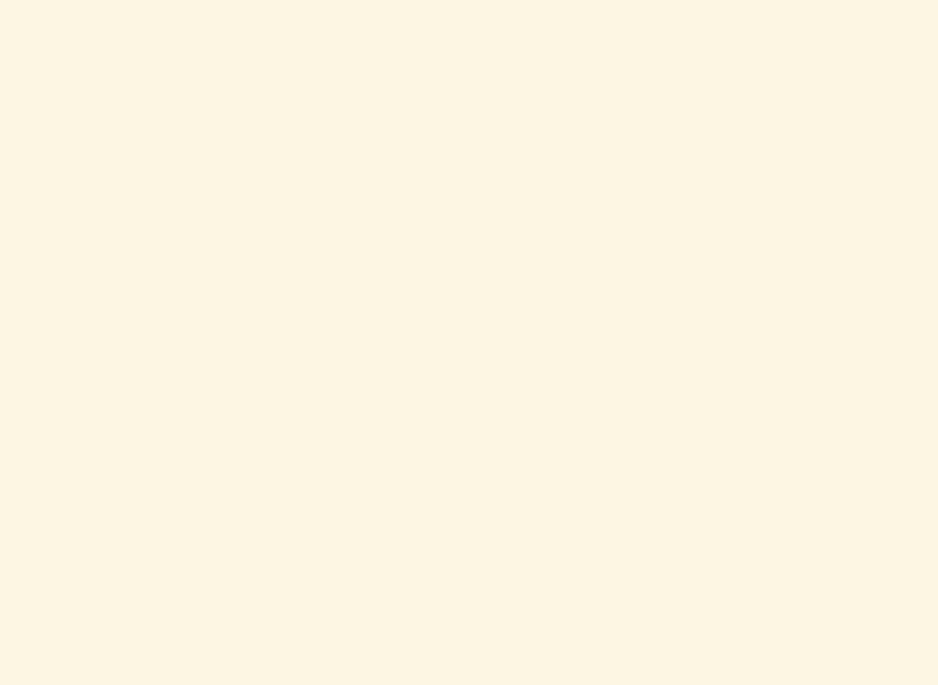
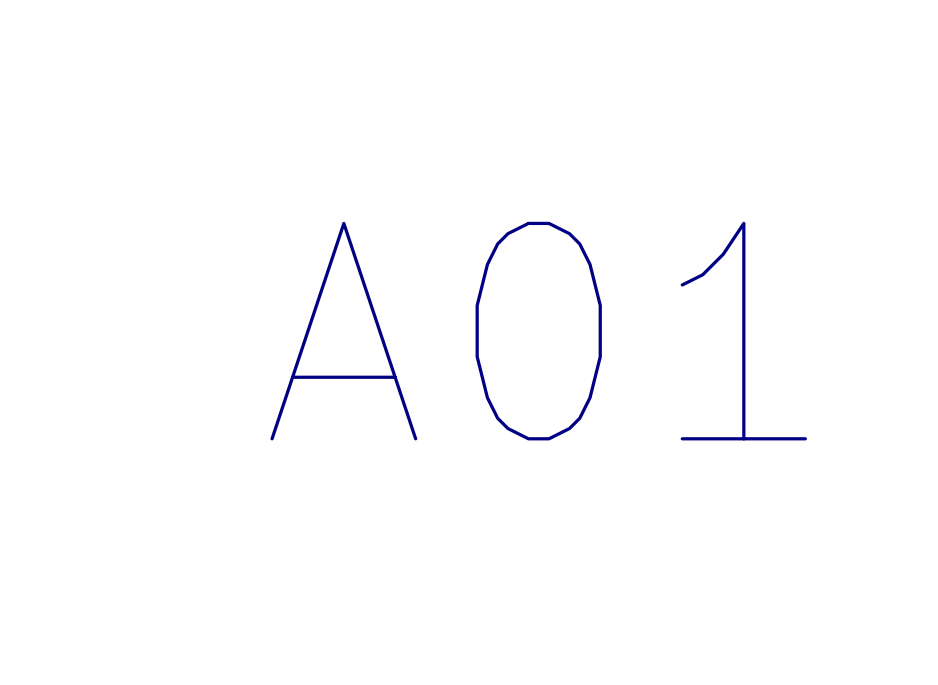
text: none -> A01 (538, 331)

